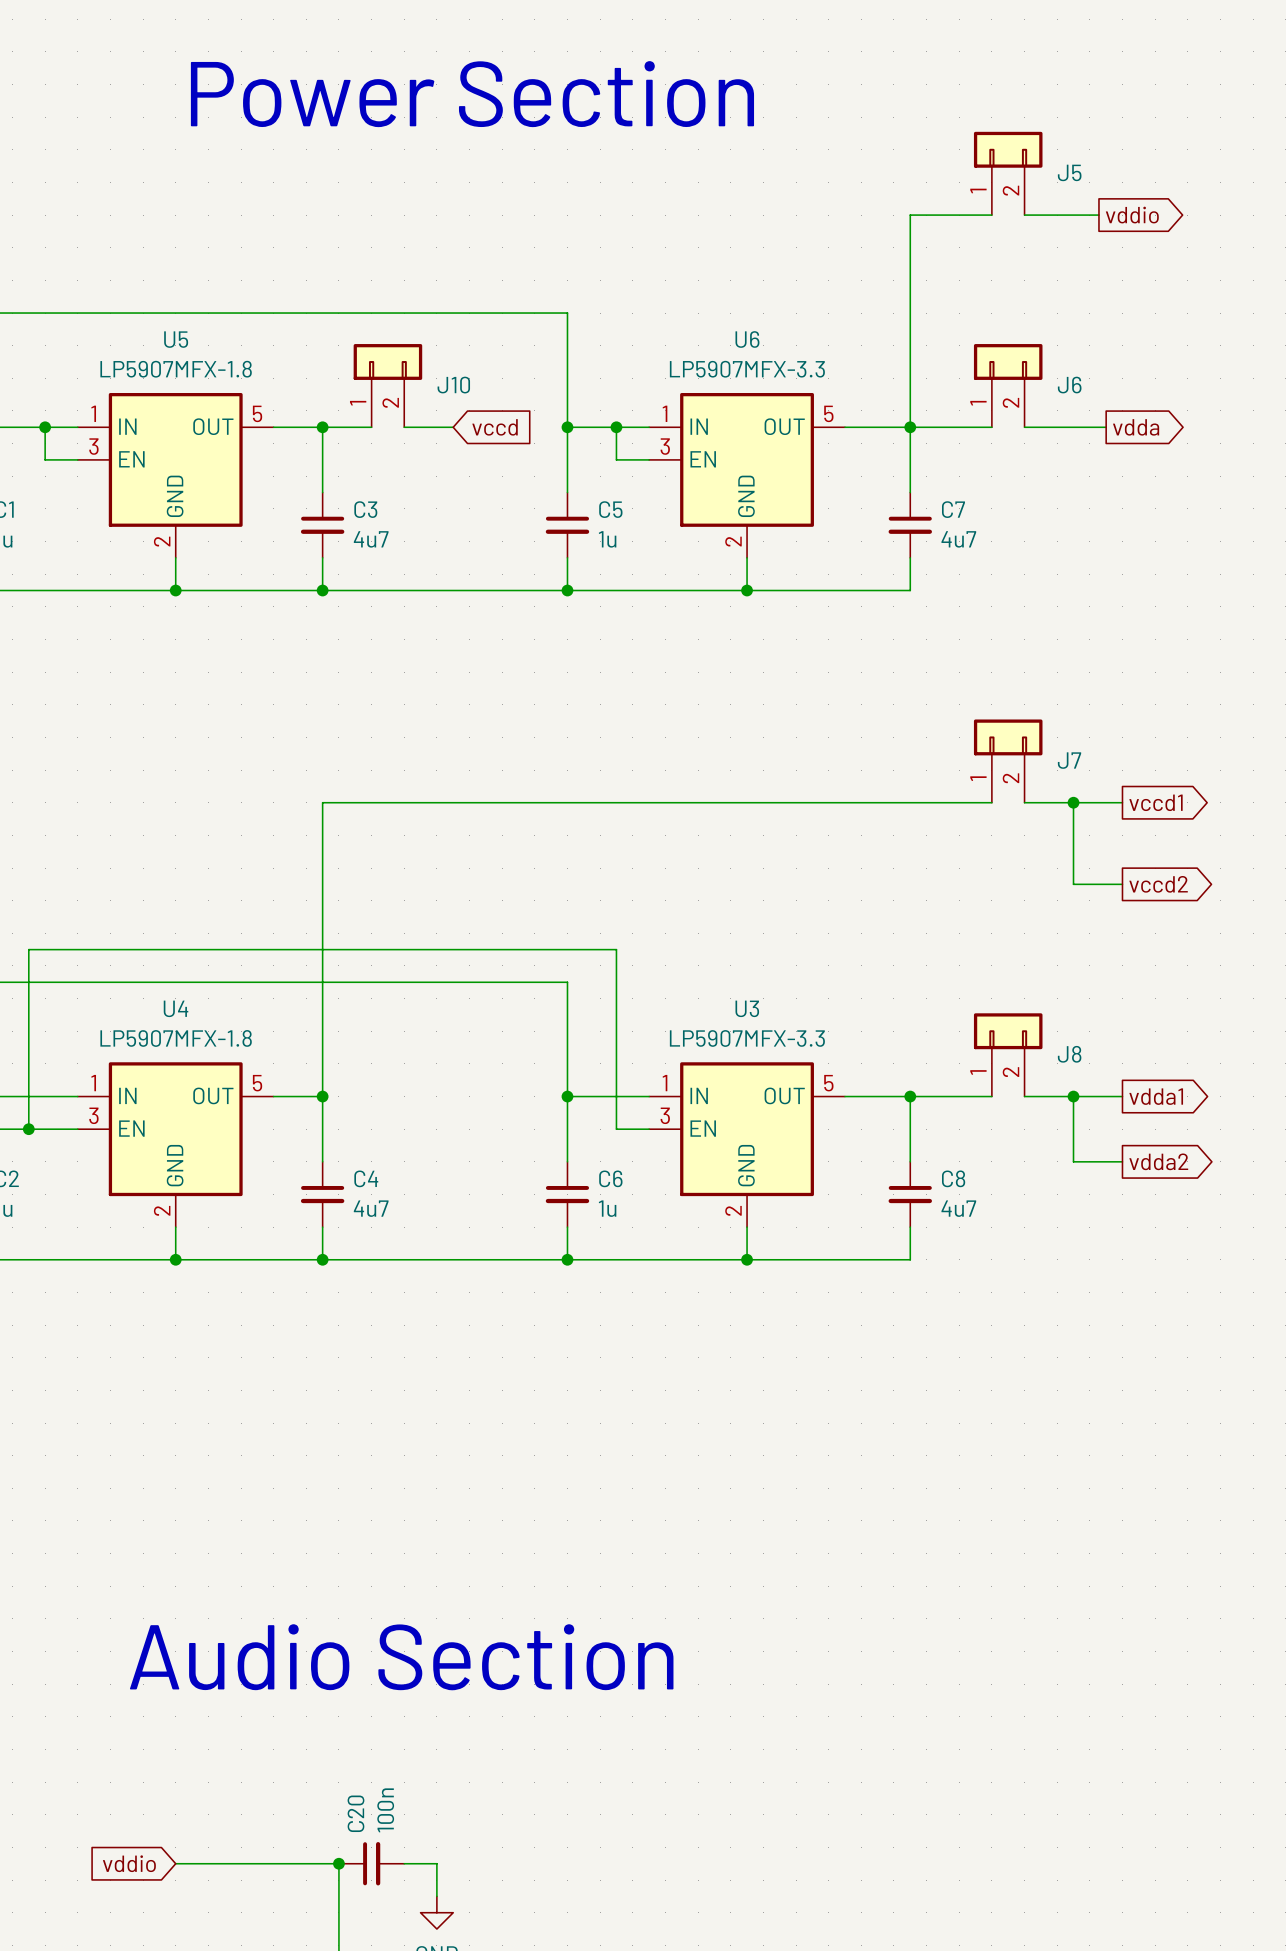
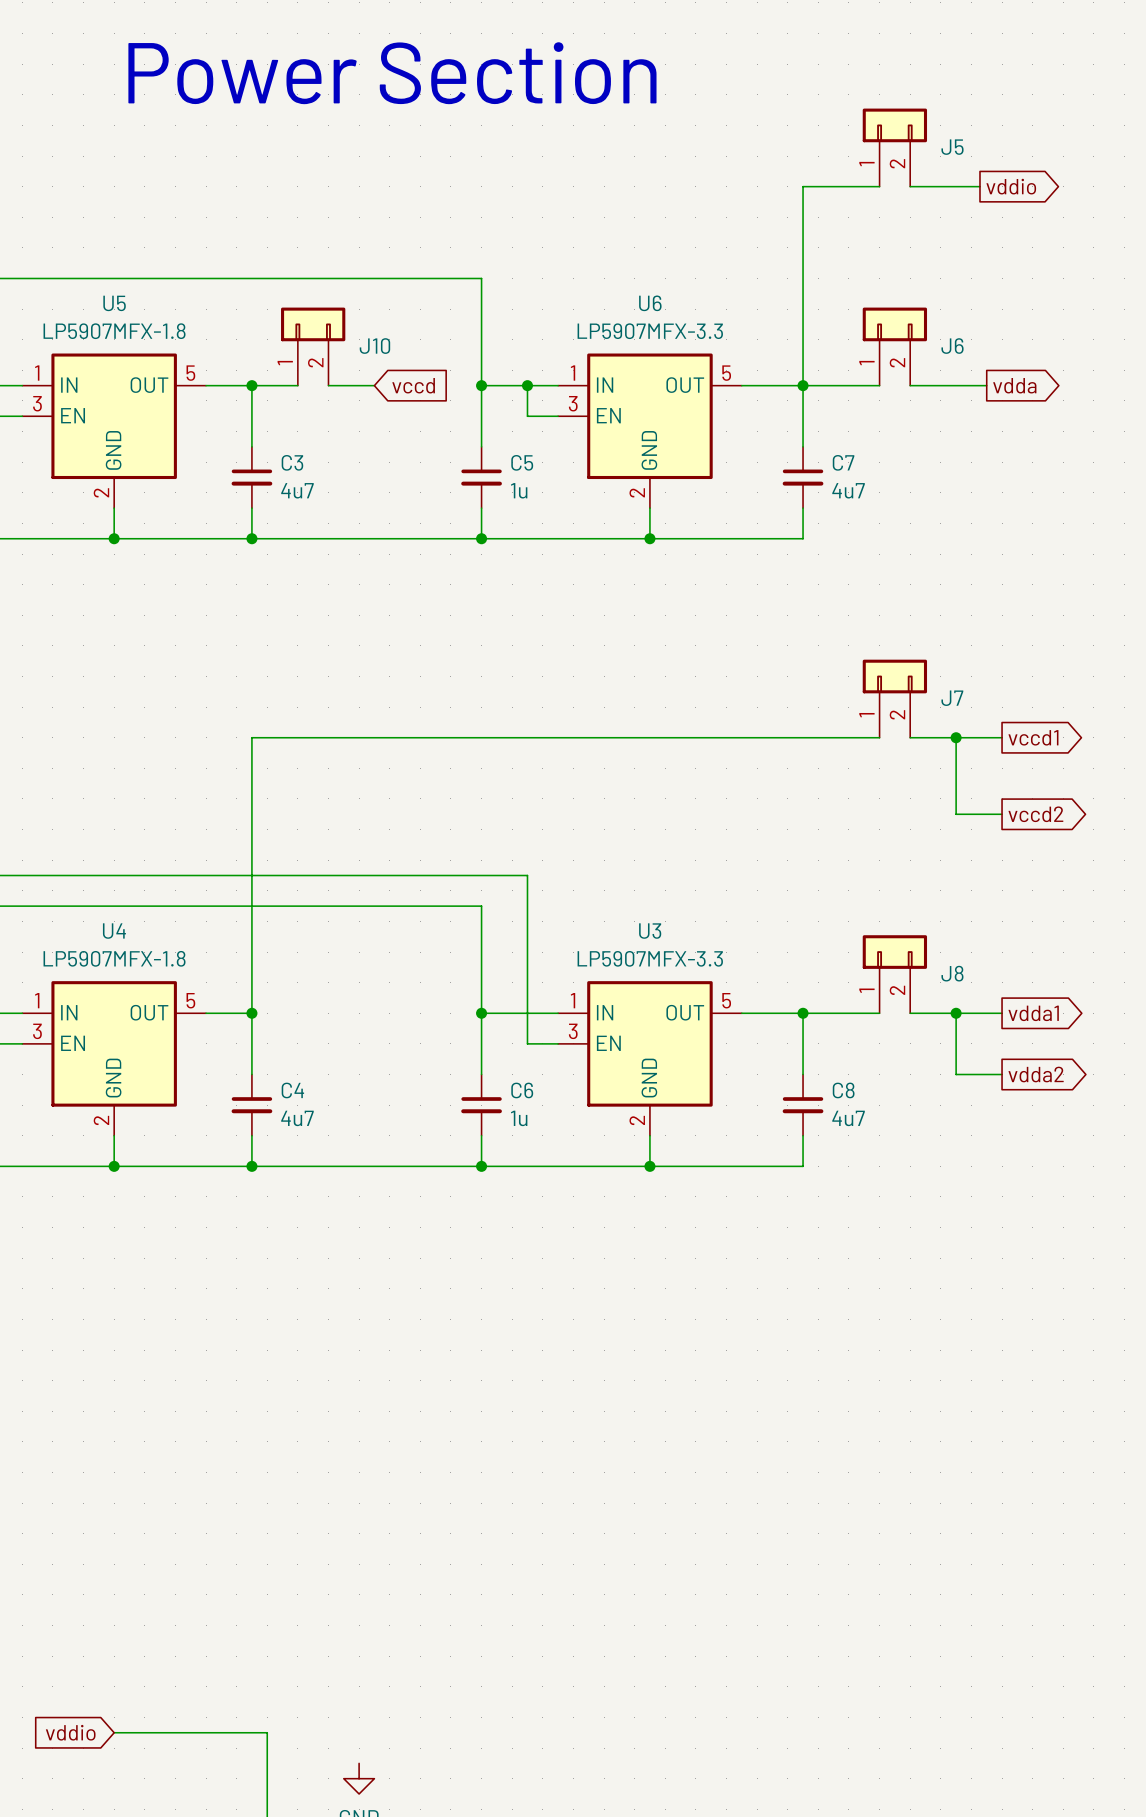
text: Audio Section (401, 1657) -> none
junction: (338, 1863) -> none
C20: 100n (371, 1863) -> none
wire: (404, 1863) (436, 1863) (436, 1896) -> none

